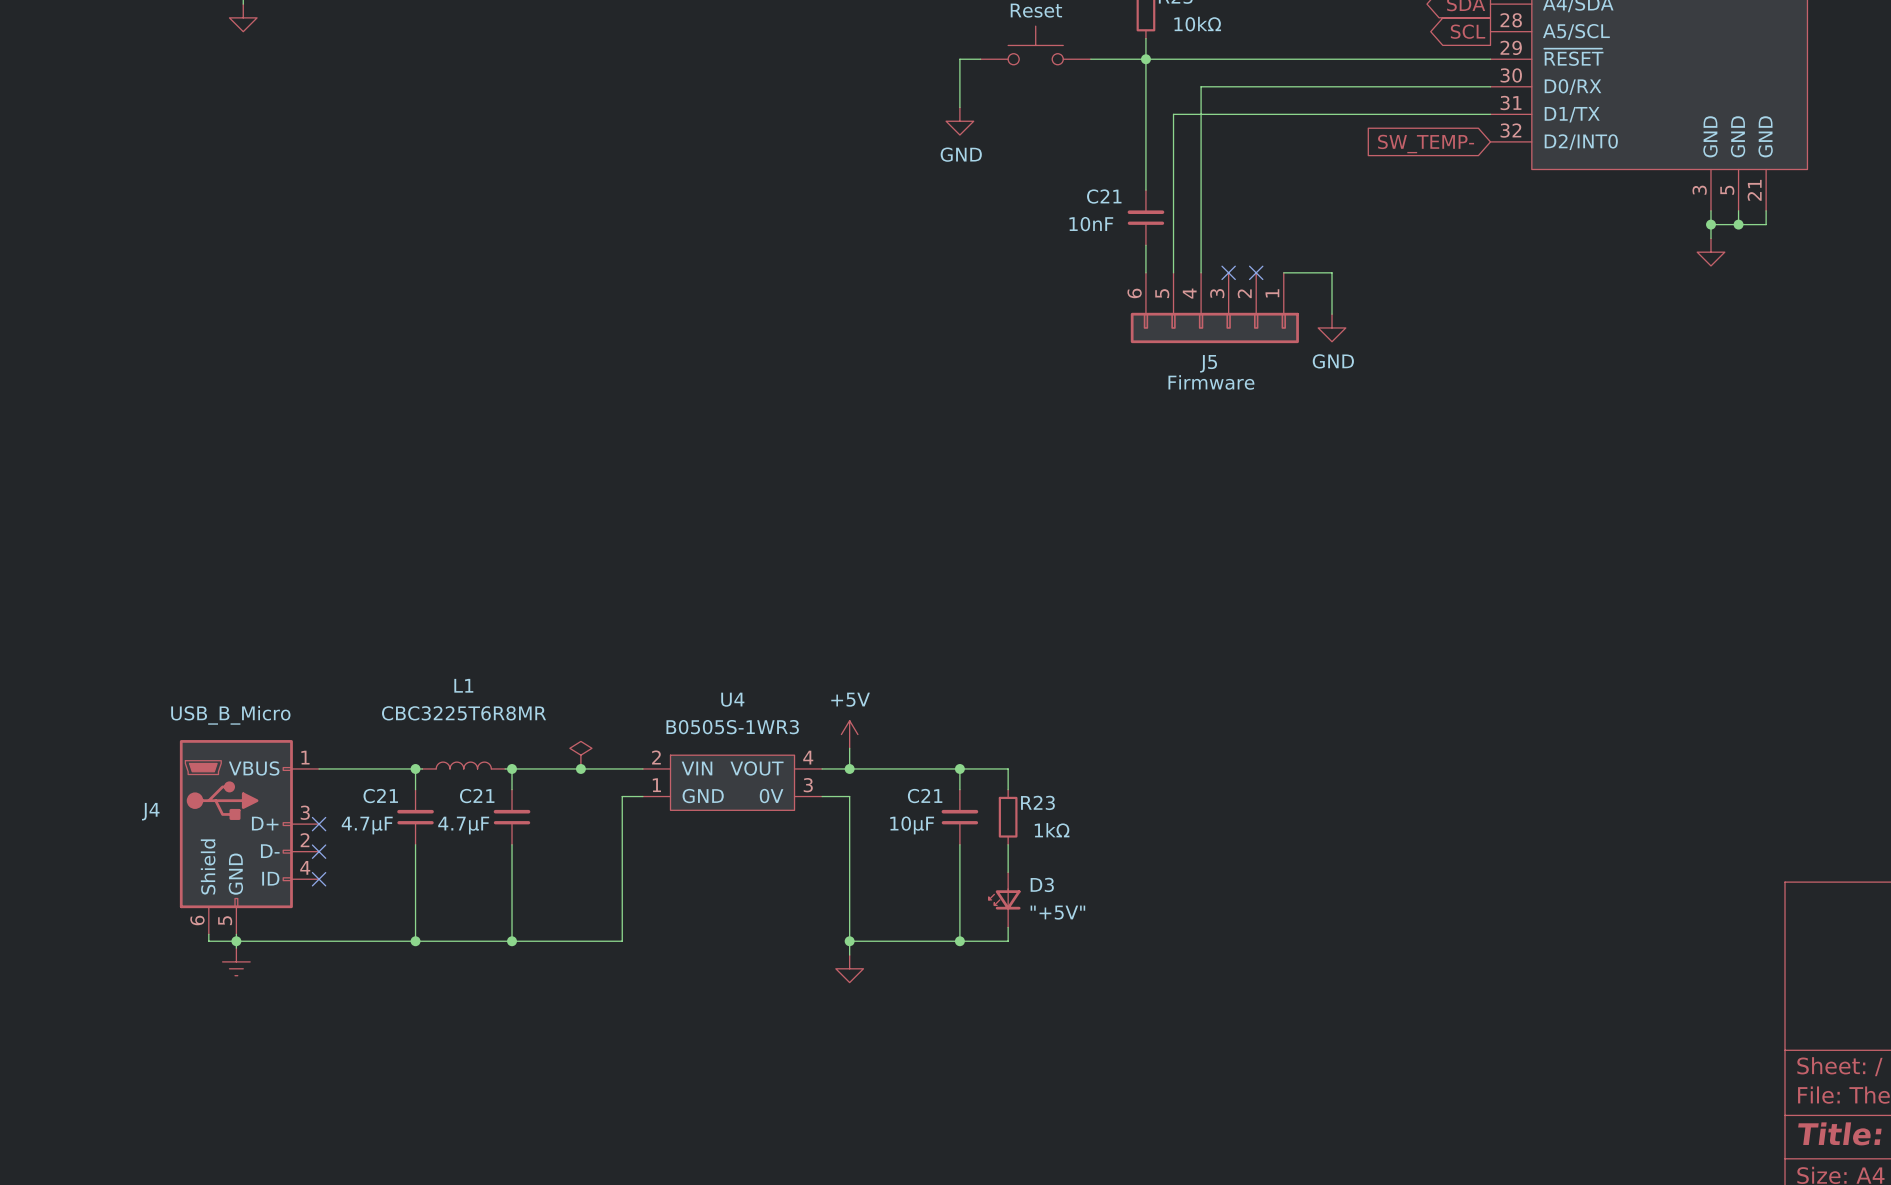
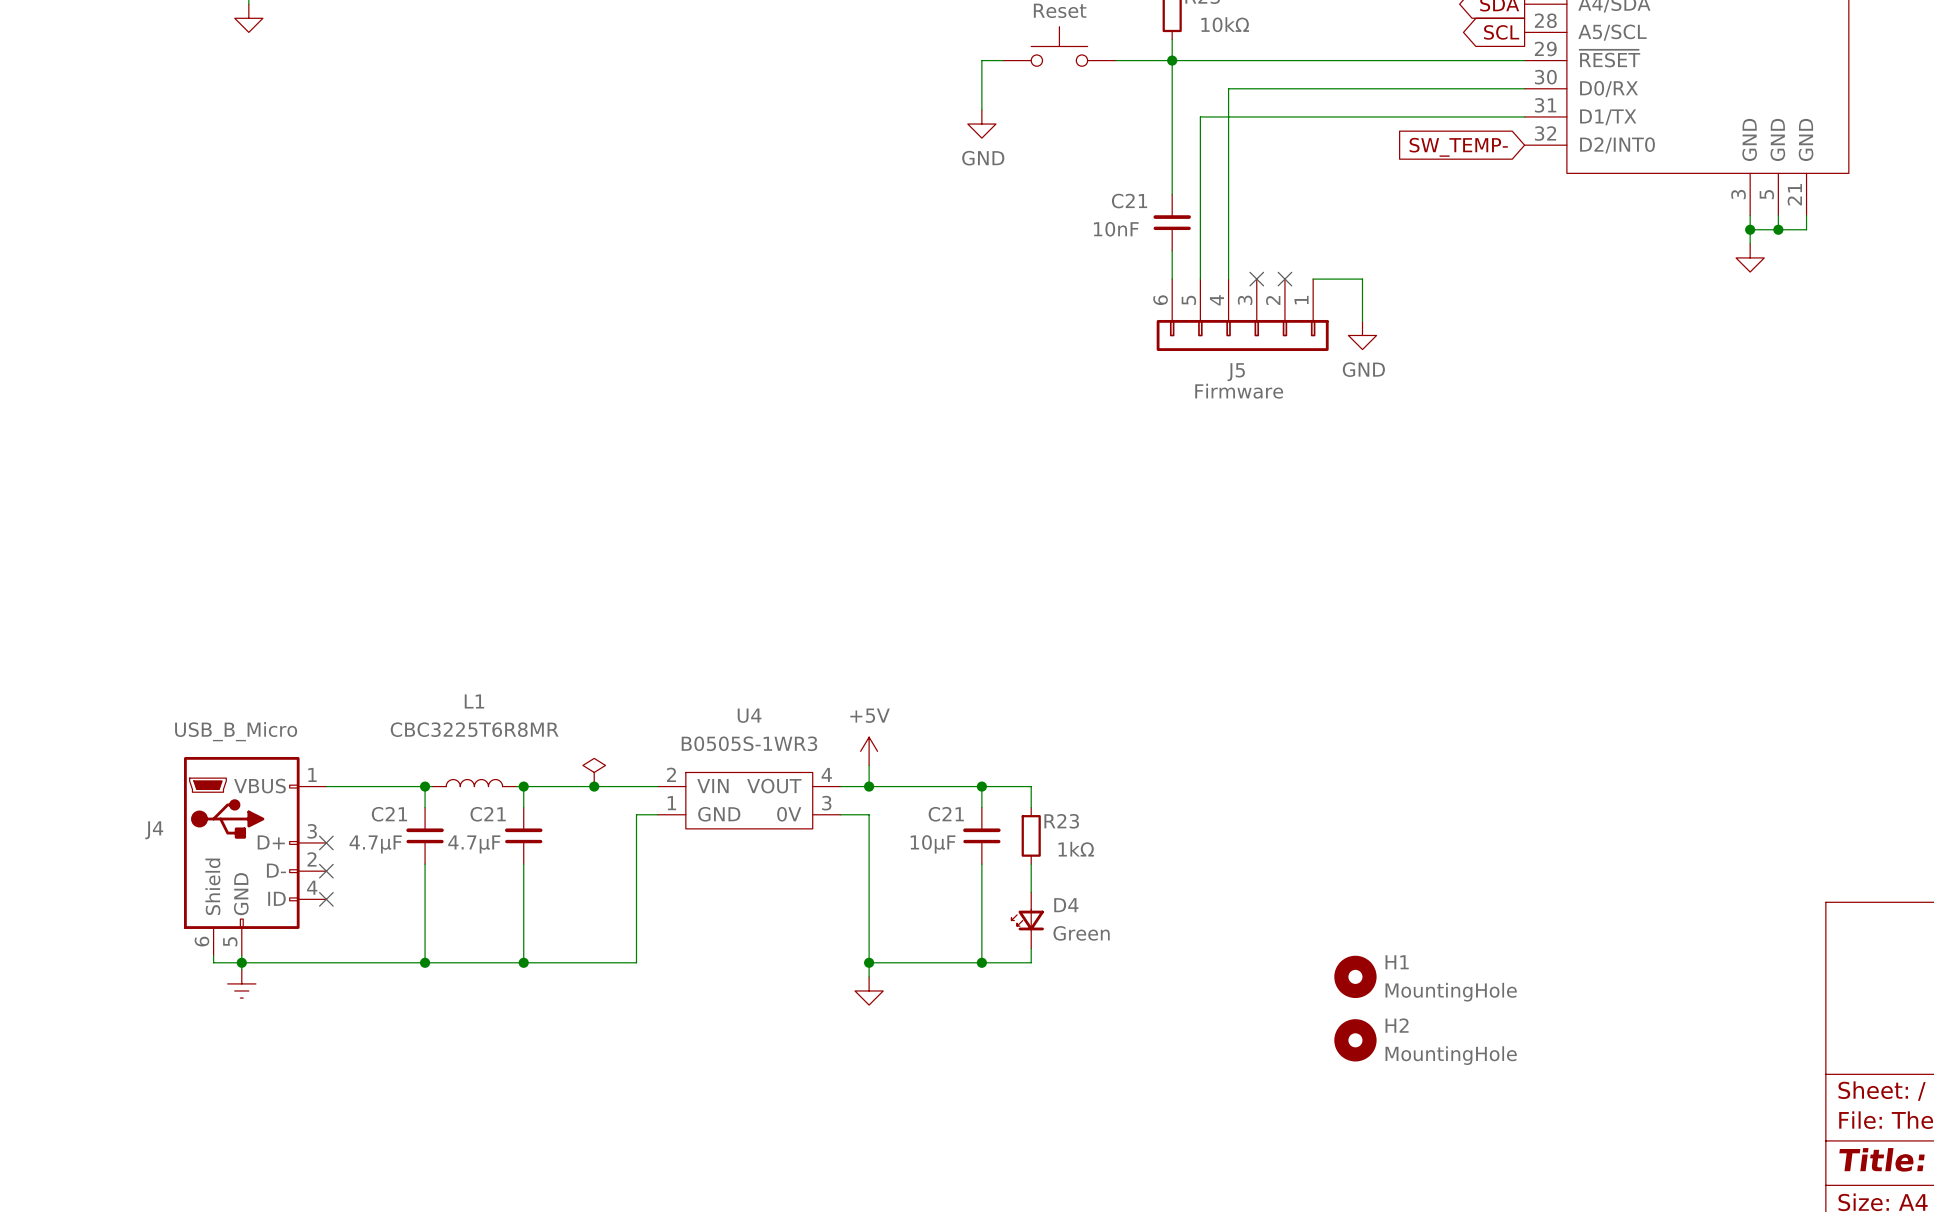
D3 name: D3 (1042, 884) -> D4 (1066, 905)
D3 value: "+5V" (1057, 912) -> Green (1081, 933)
H1: none -> MountingHole (1355, 976)
H2: none -> MountingHole (1355, 1040)

